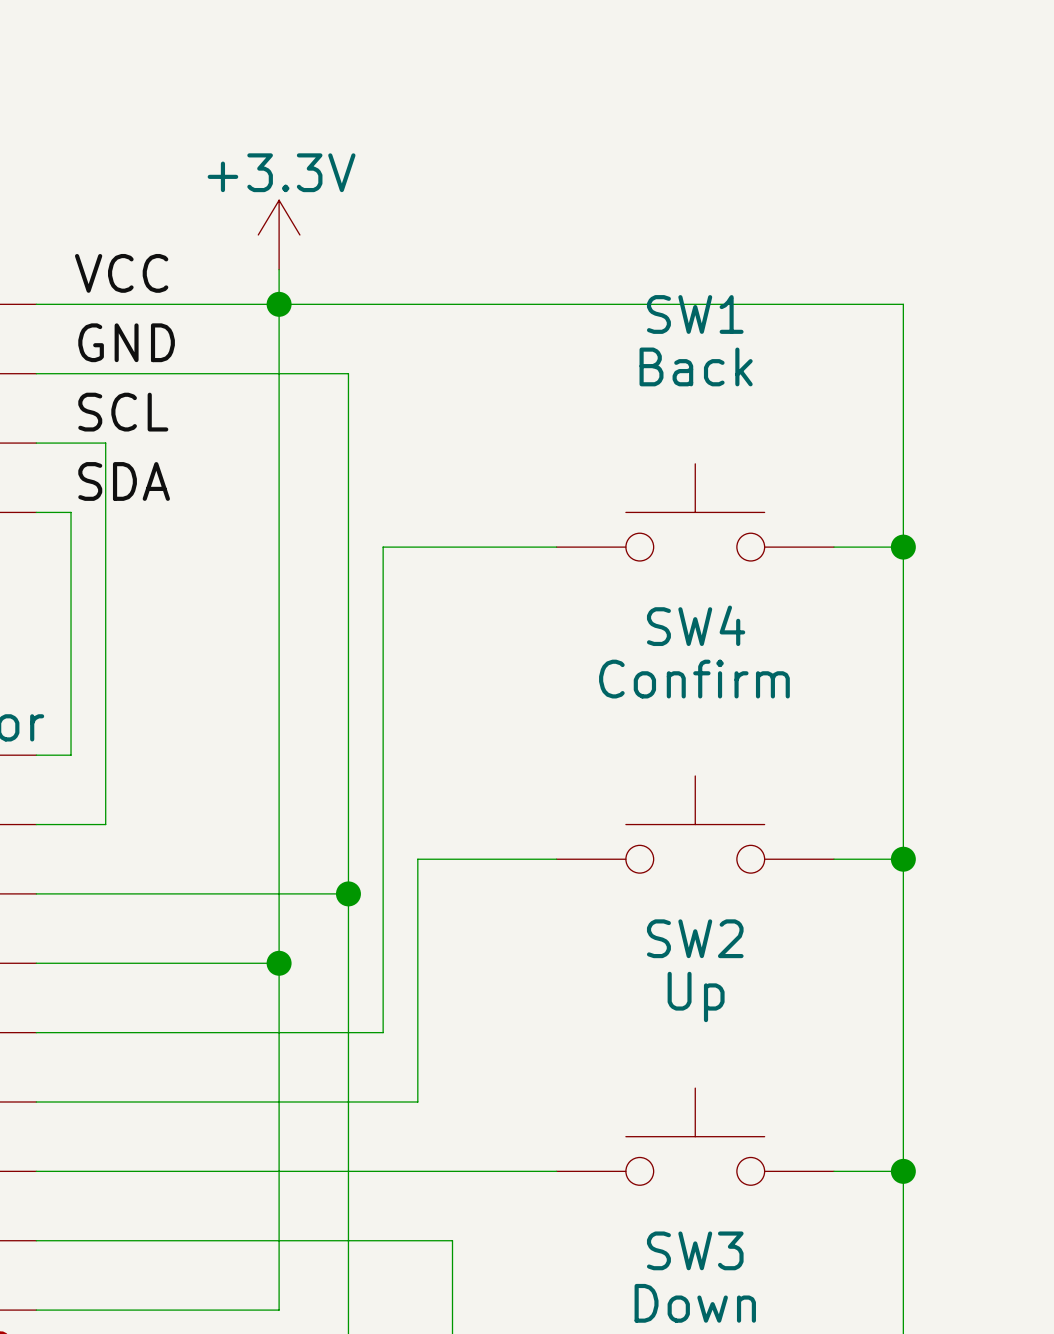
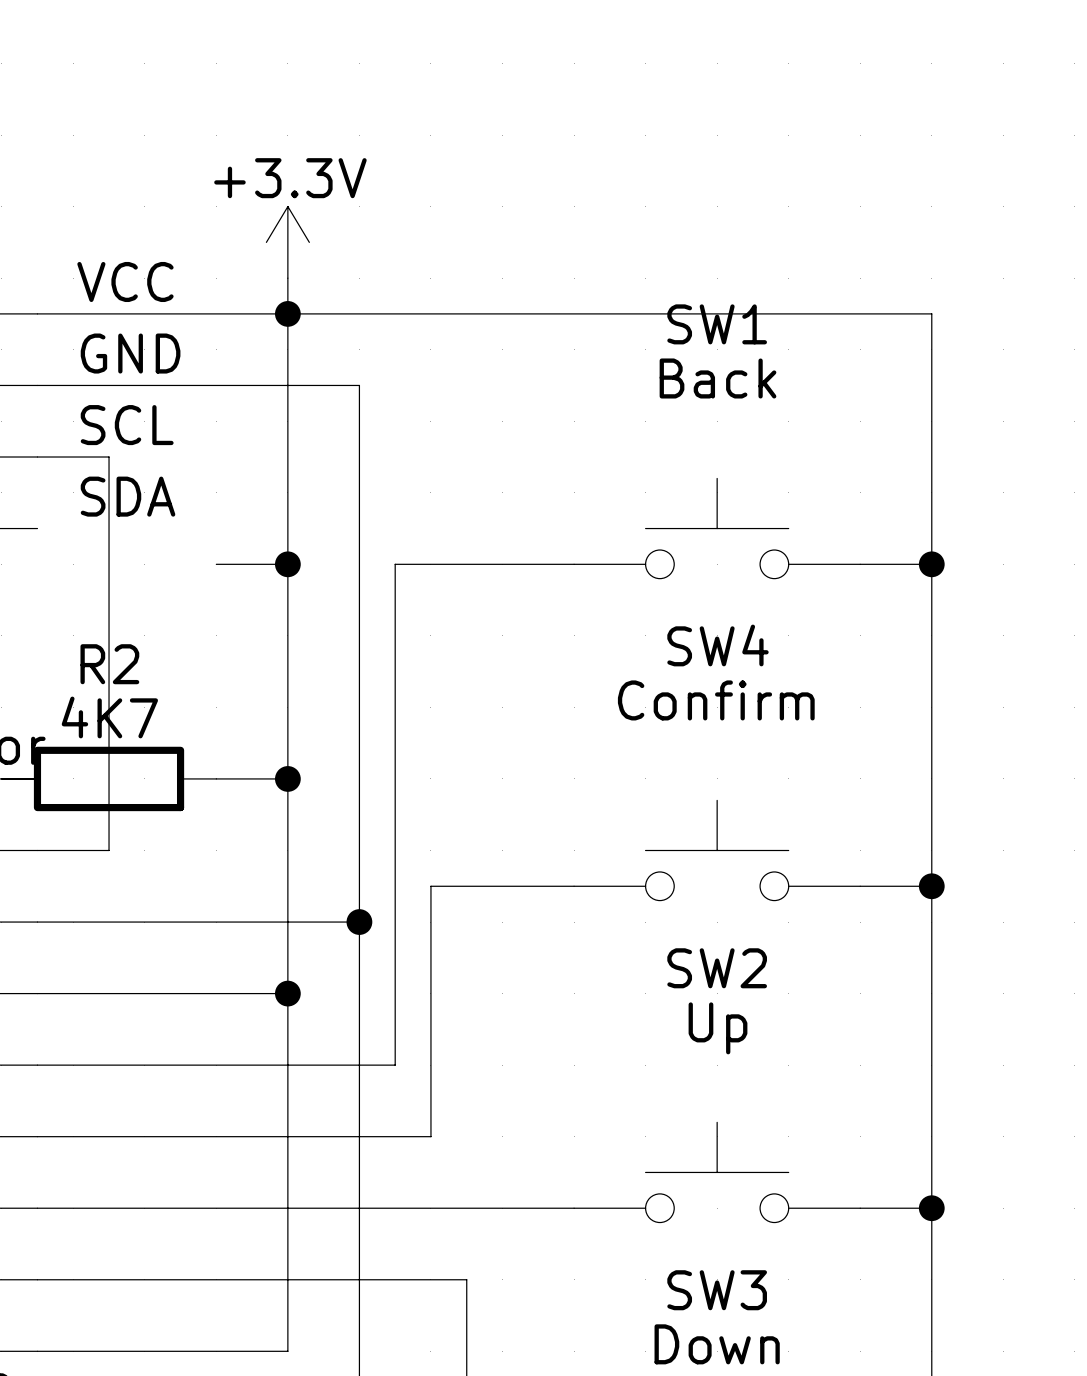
wire: (36, 512) (71, 512) (71, 755) (36, 755) -> none
wire: none -> (216, 564) (287, 564)
junction: none -> (287, 564)
R2: none -> 4K7 (109, 778)
wire: none -> (216, 778) (287, 778)
junction: none -> (287, 778)

